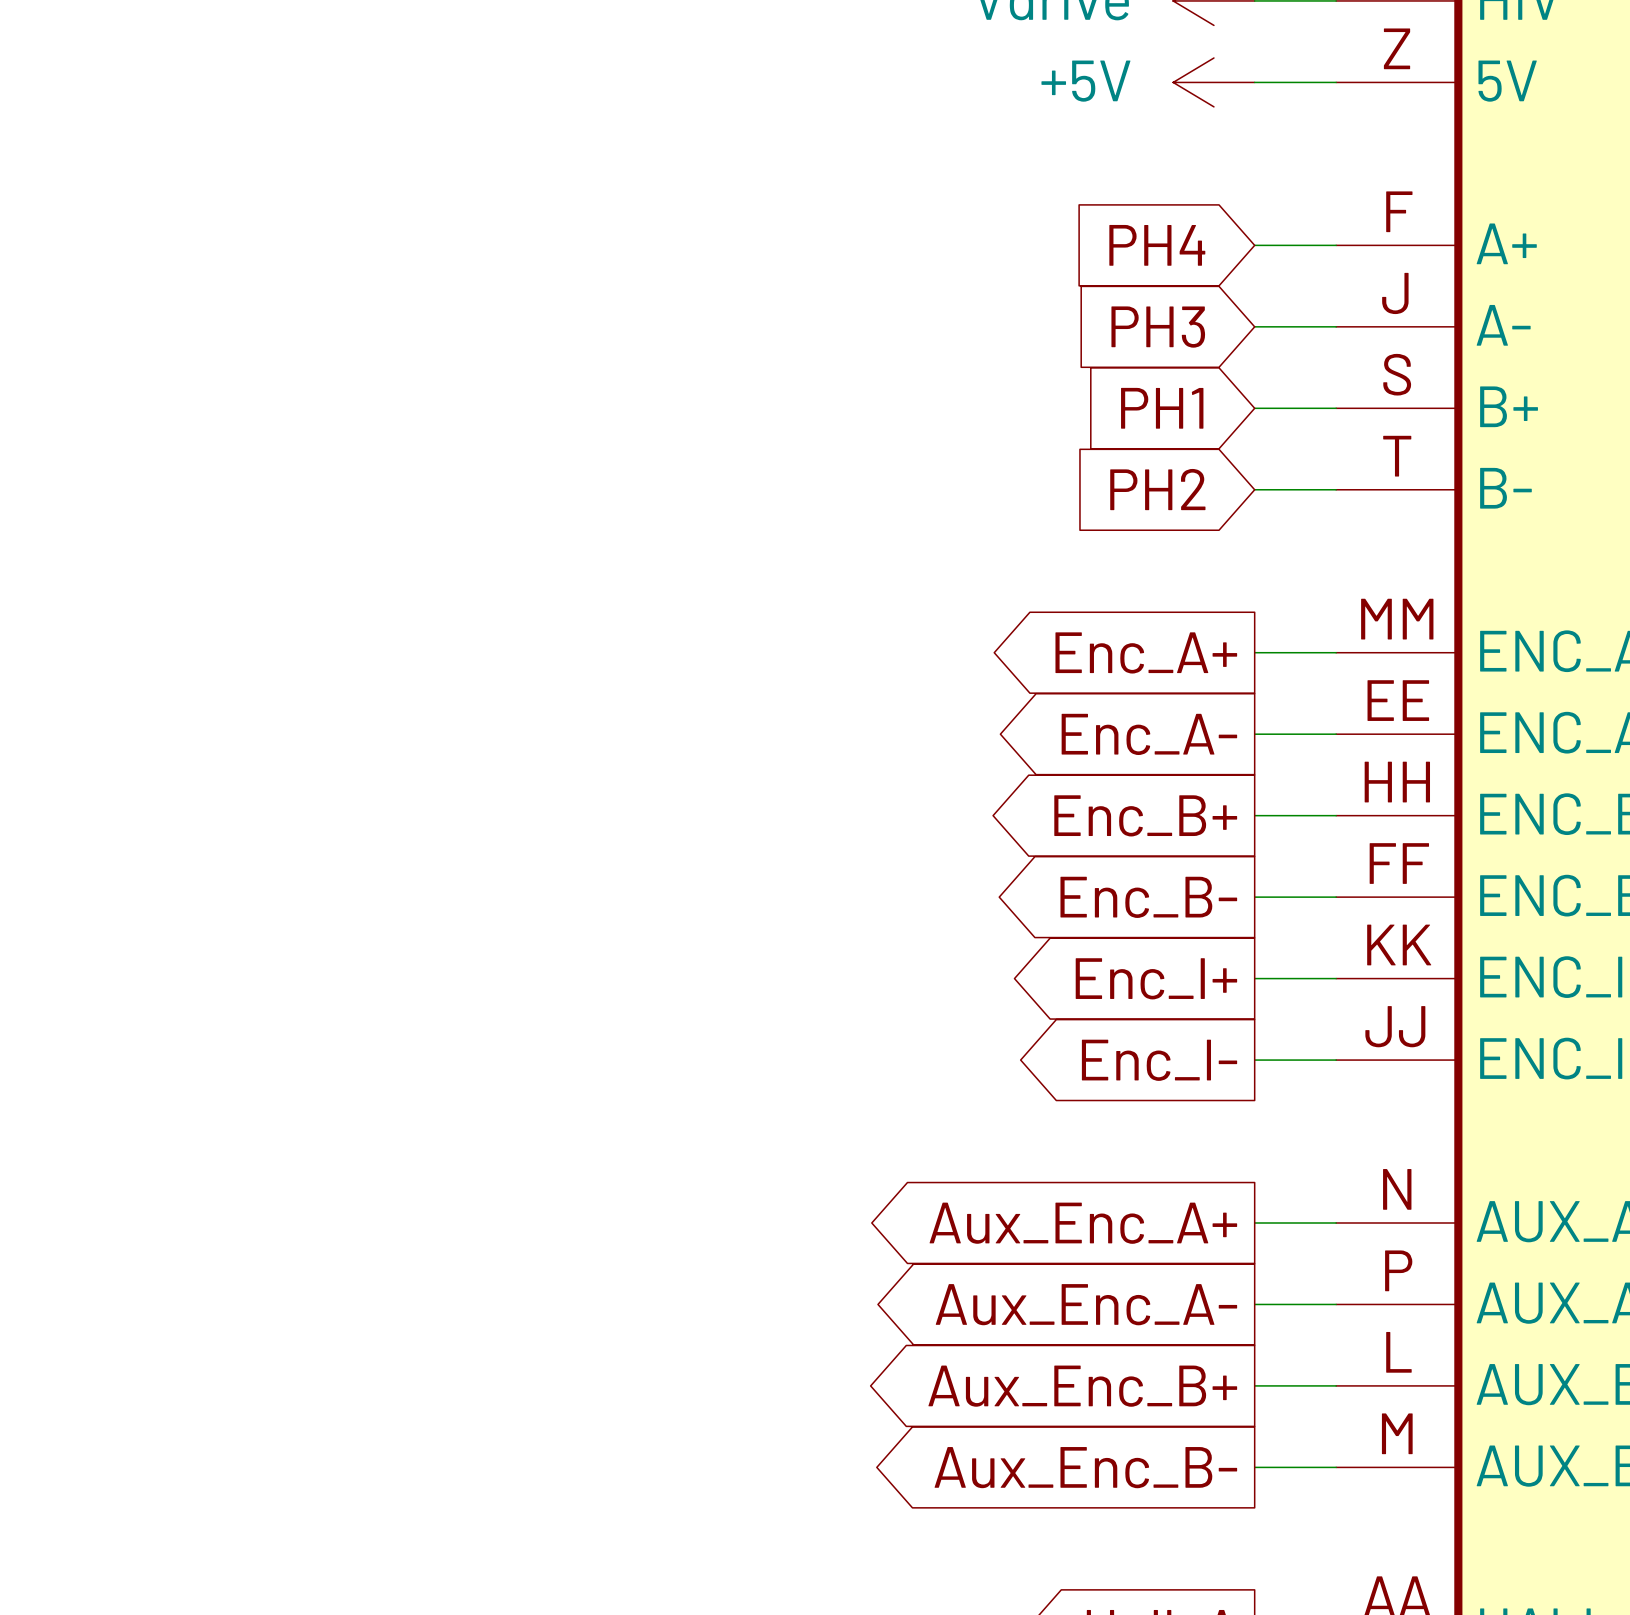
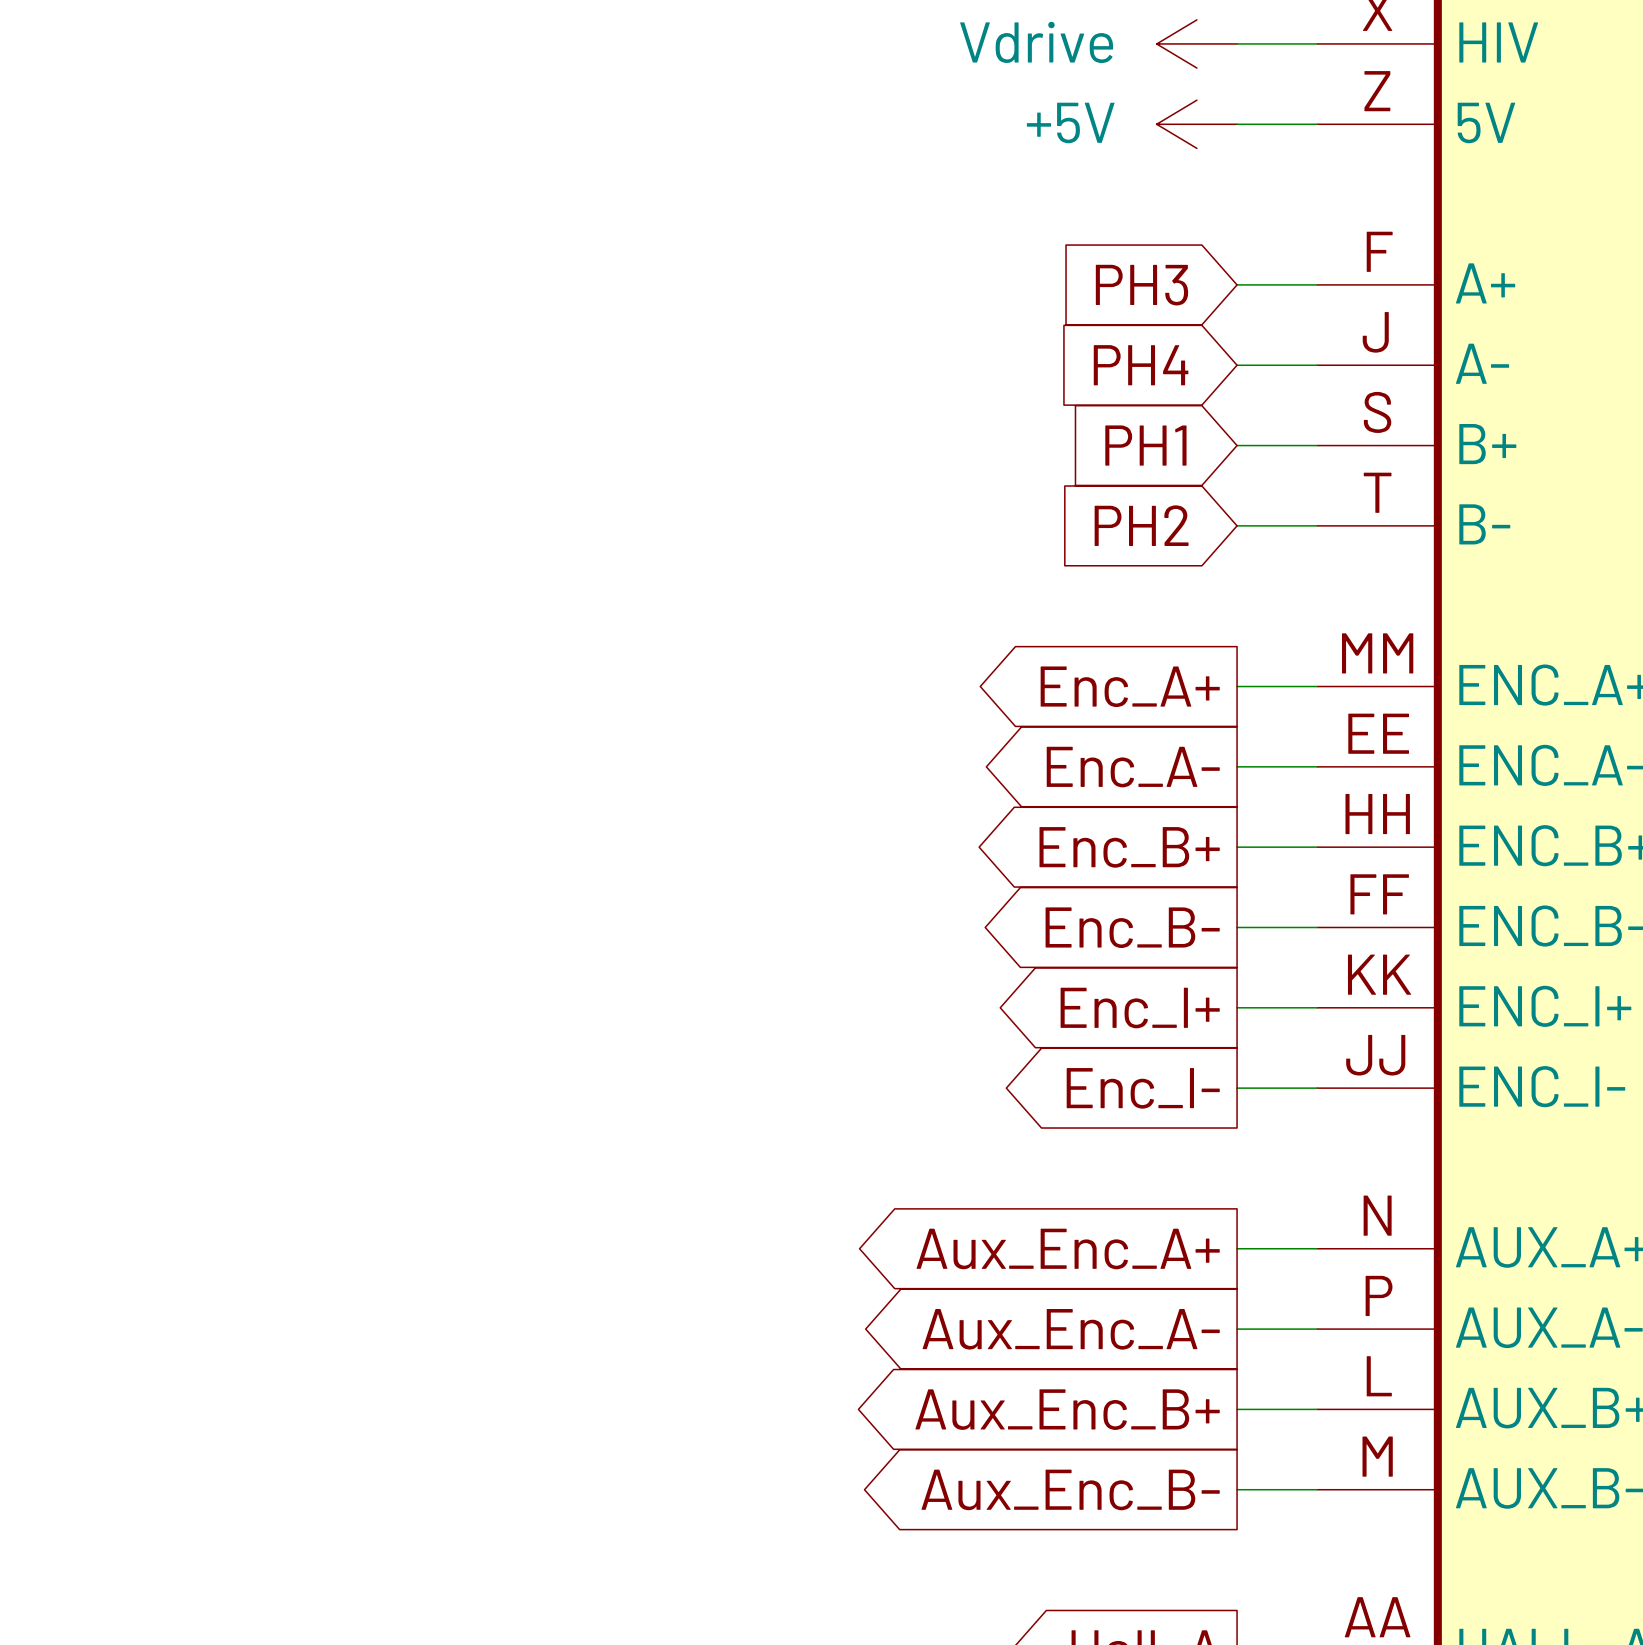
global label: PH4 (1157, 245) -> PH3 (1141, 285)
global label: PH3 (1158, 327) -> PH4 (1141, 365)

